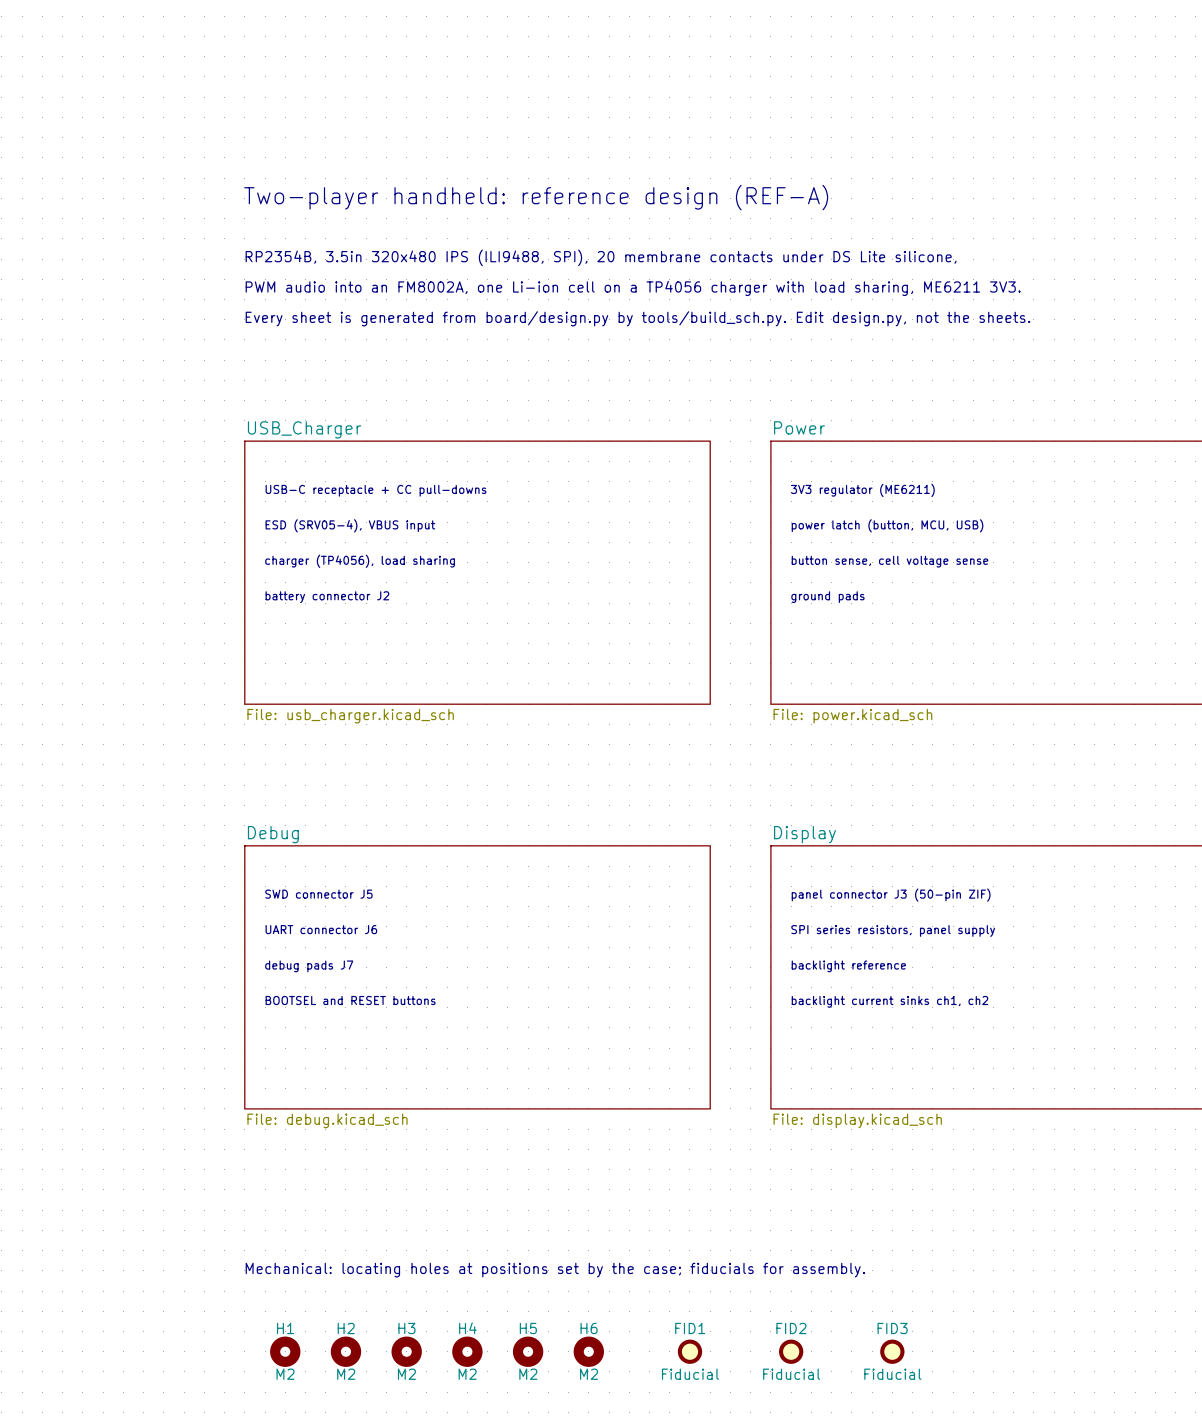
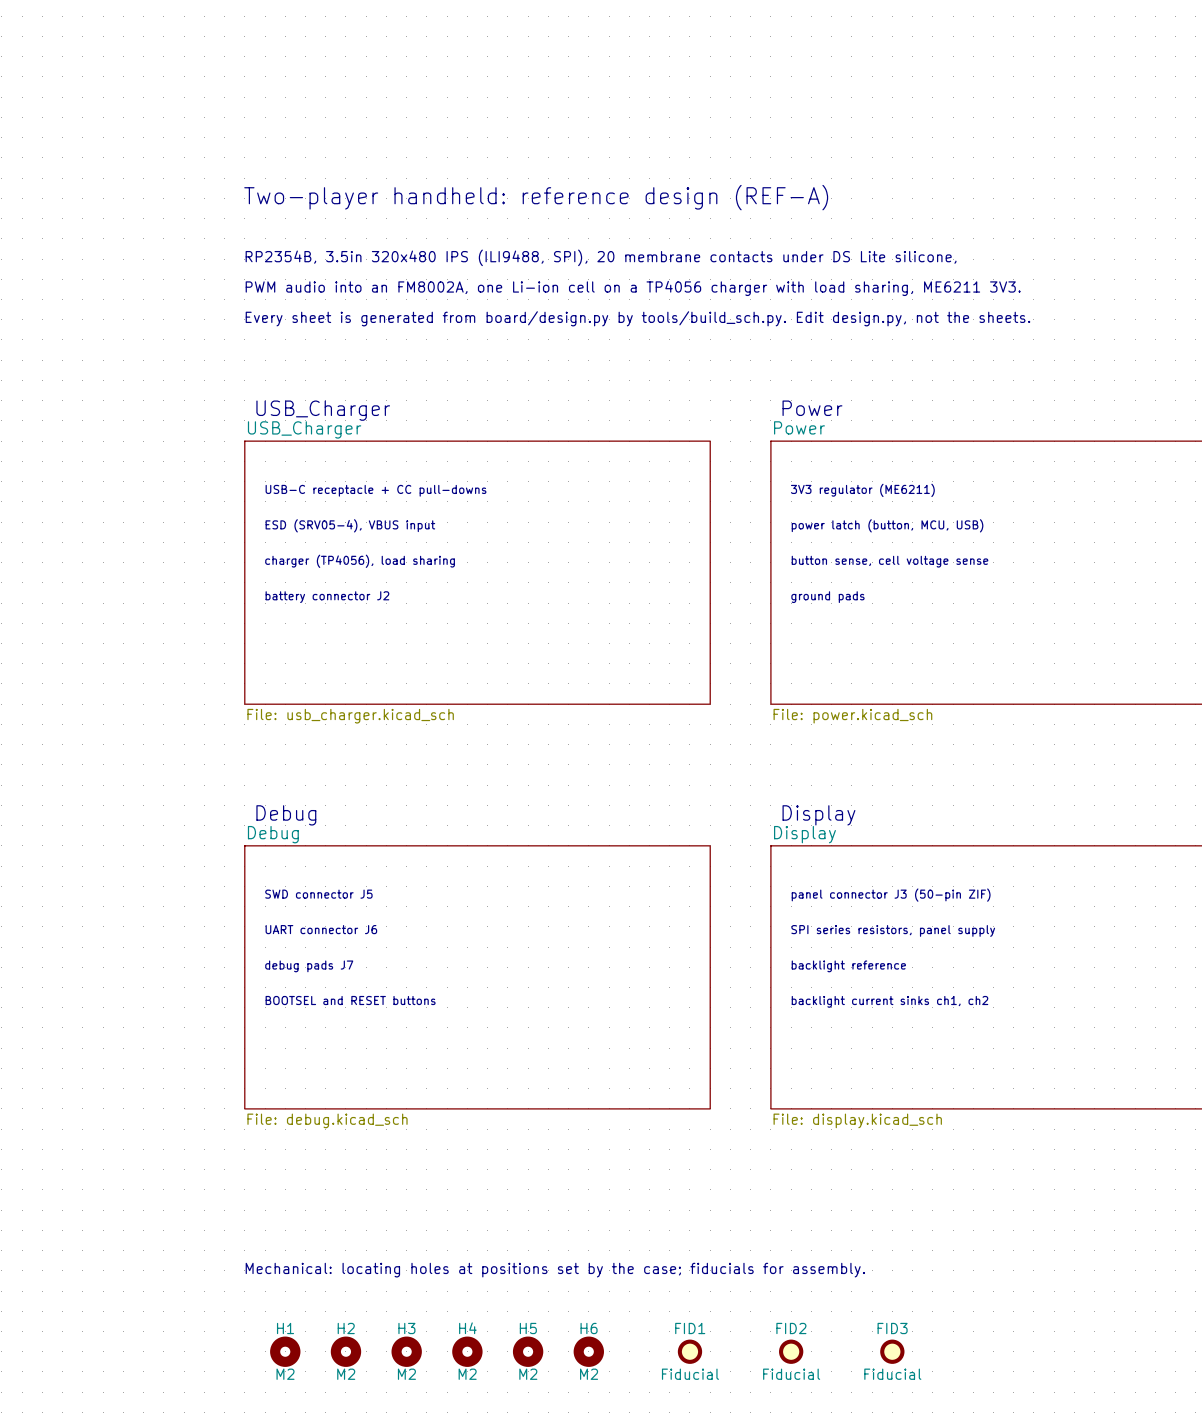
text: none -> Power (812, 408)
text: none -> USB_Charger (323, 410)
text: none -> Debug (286, 815)
text: none -> Display (818, 815)

